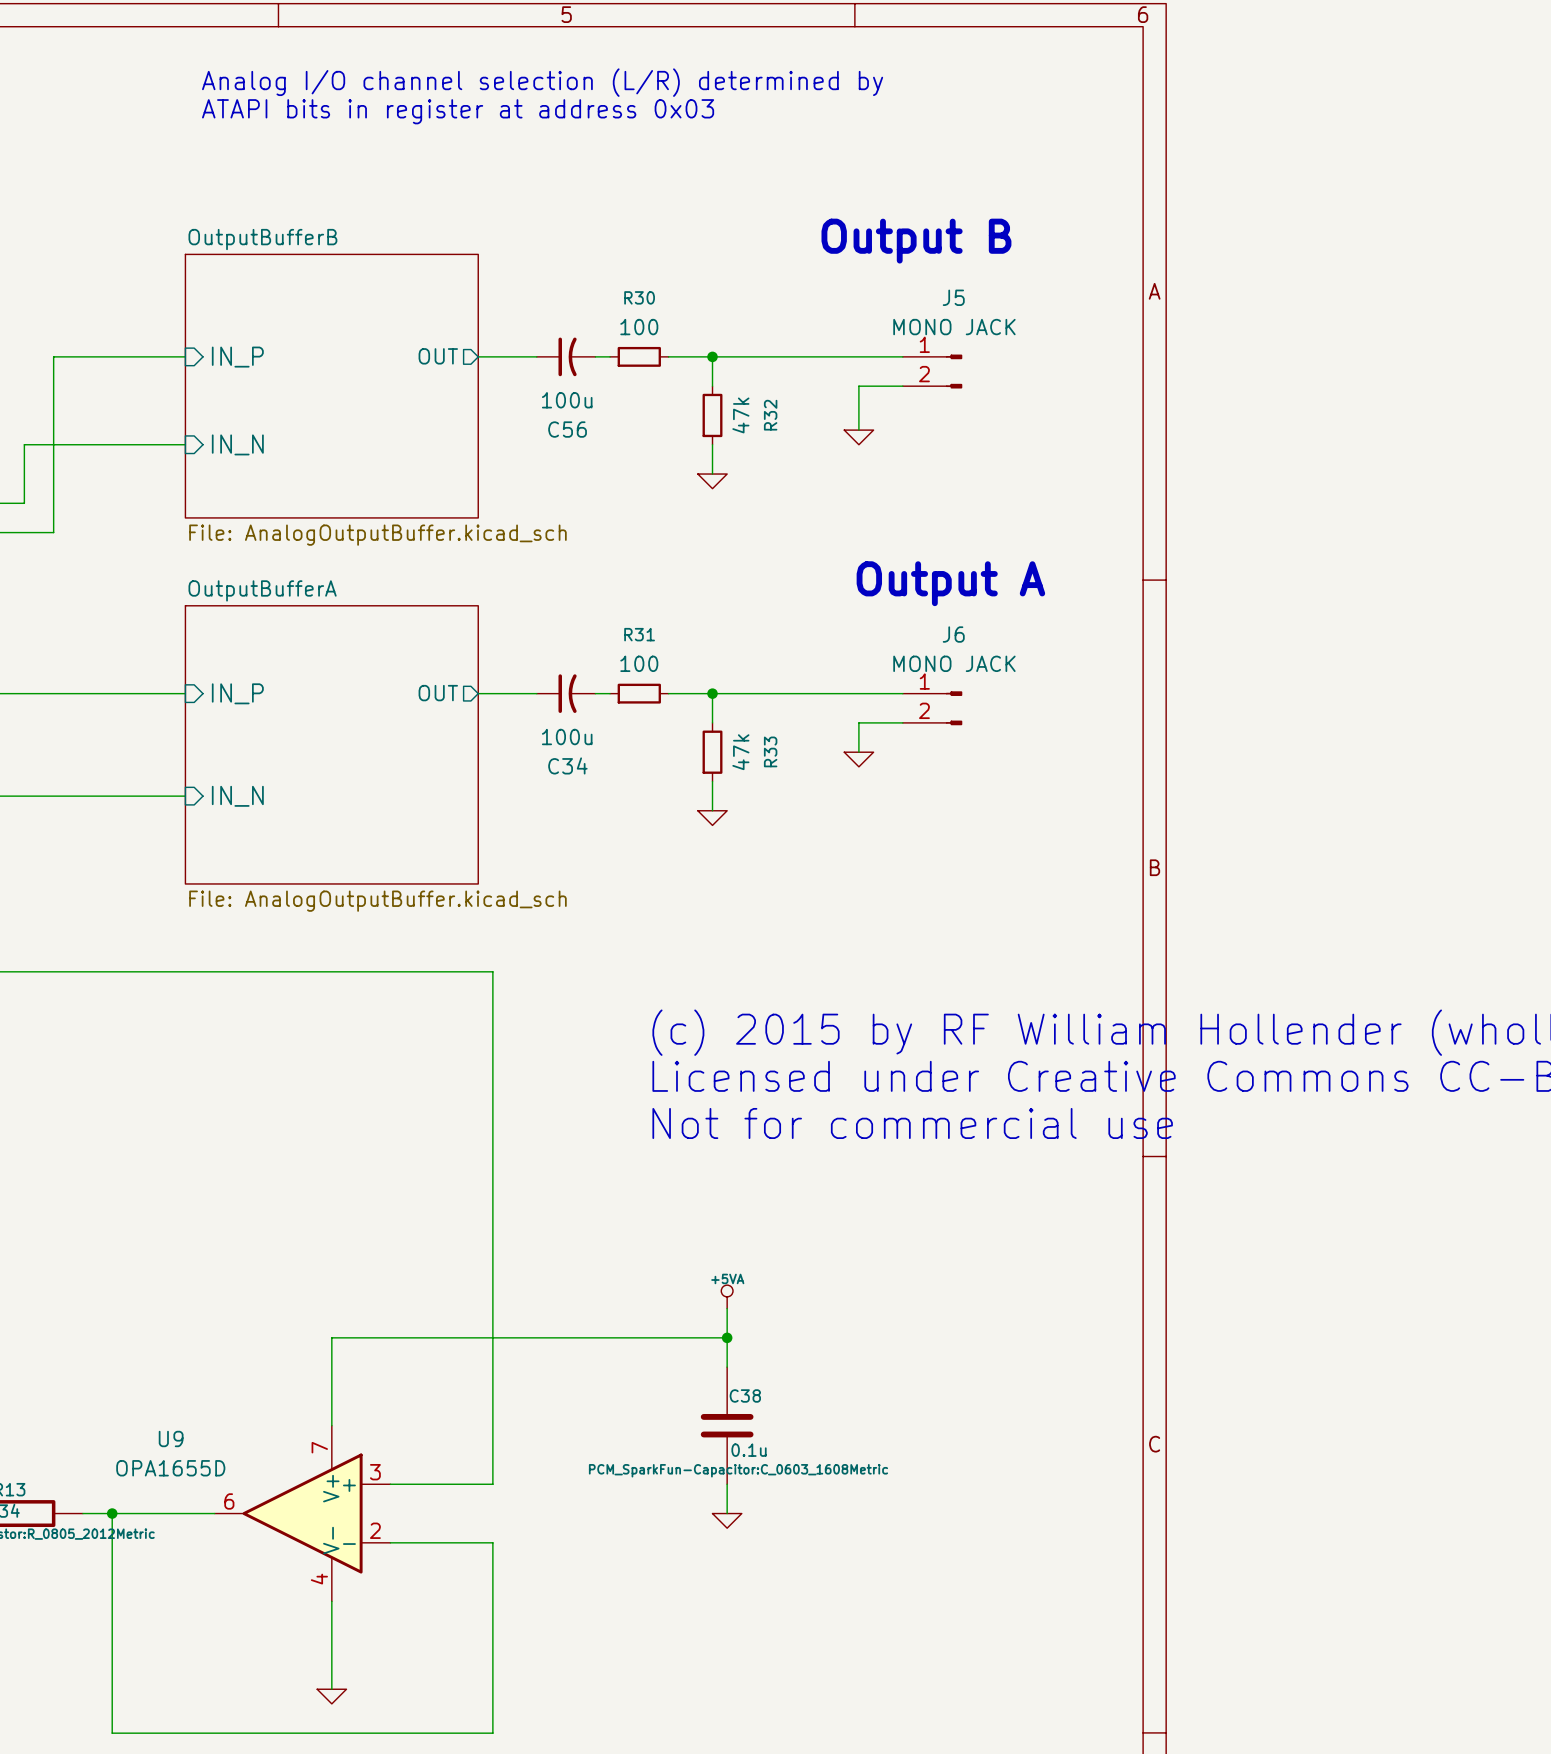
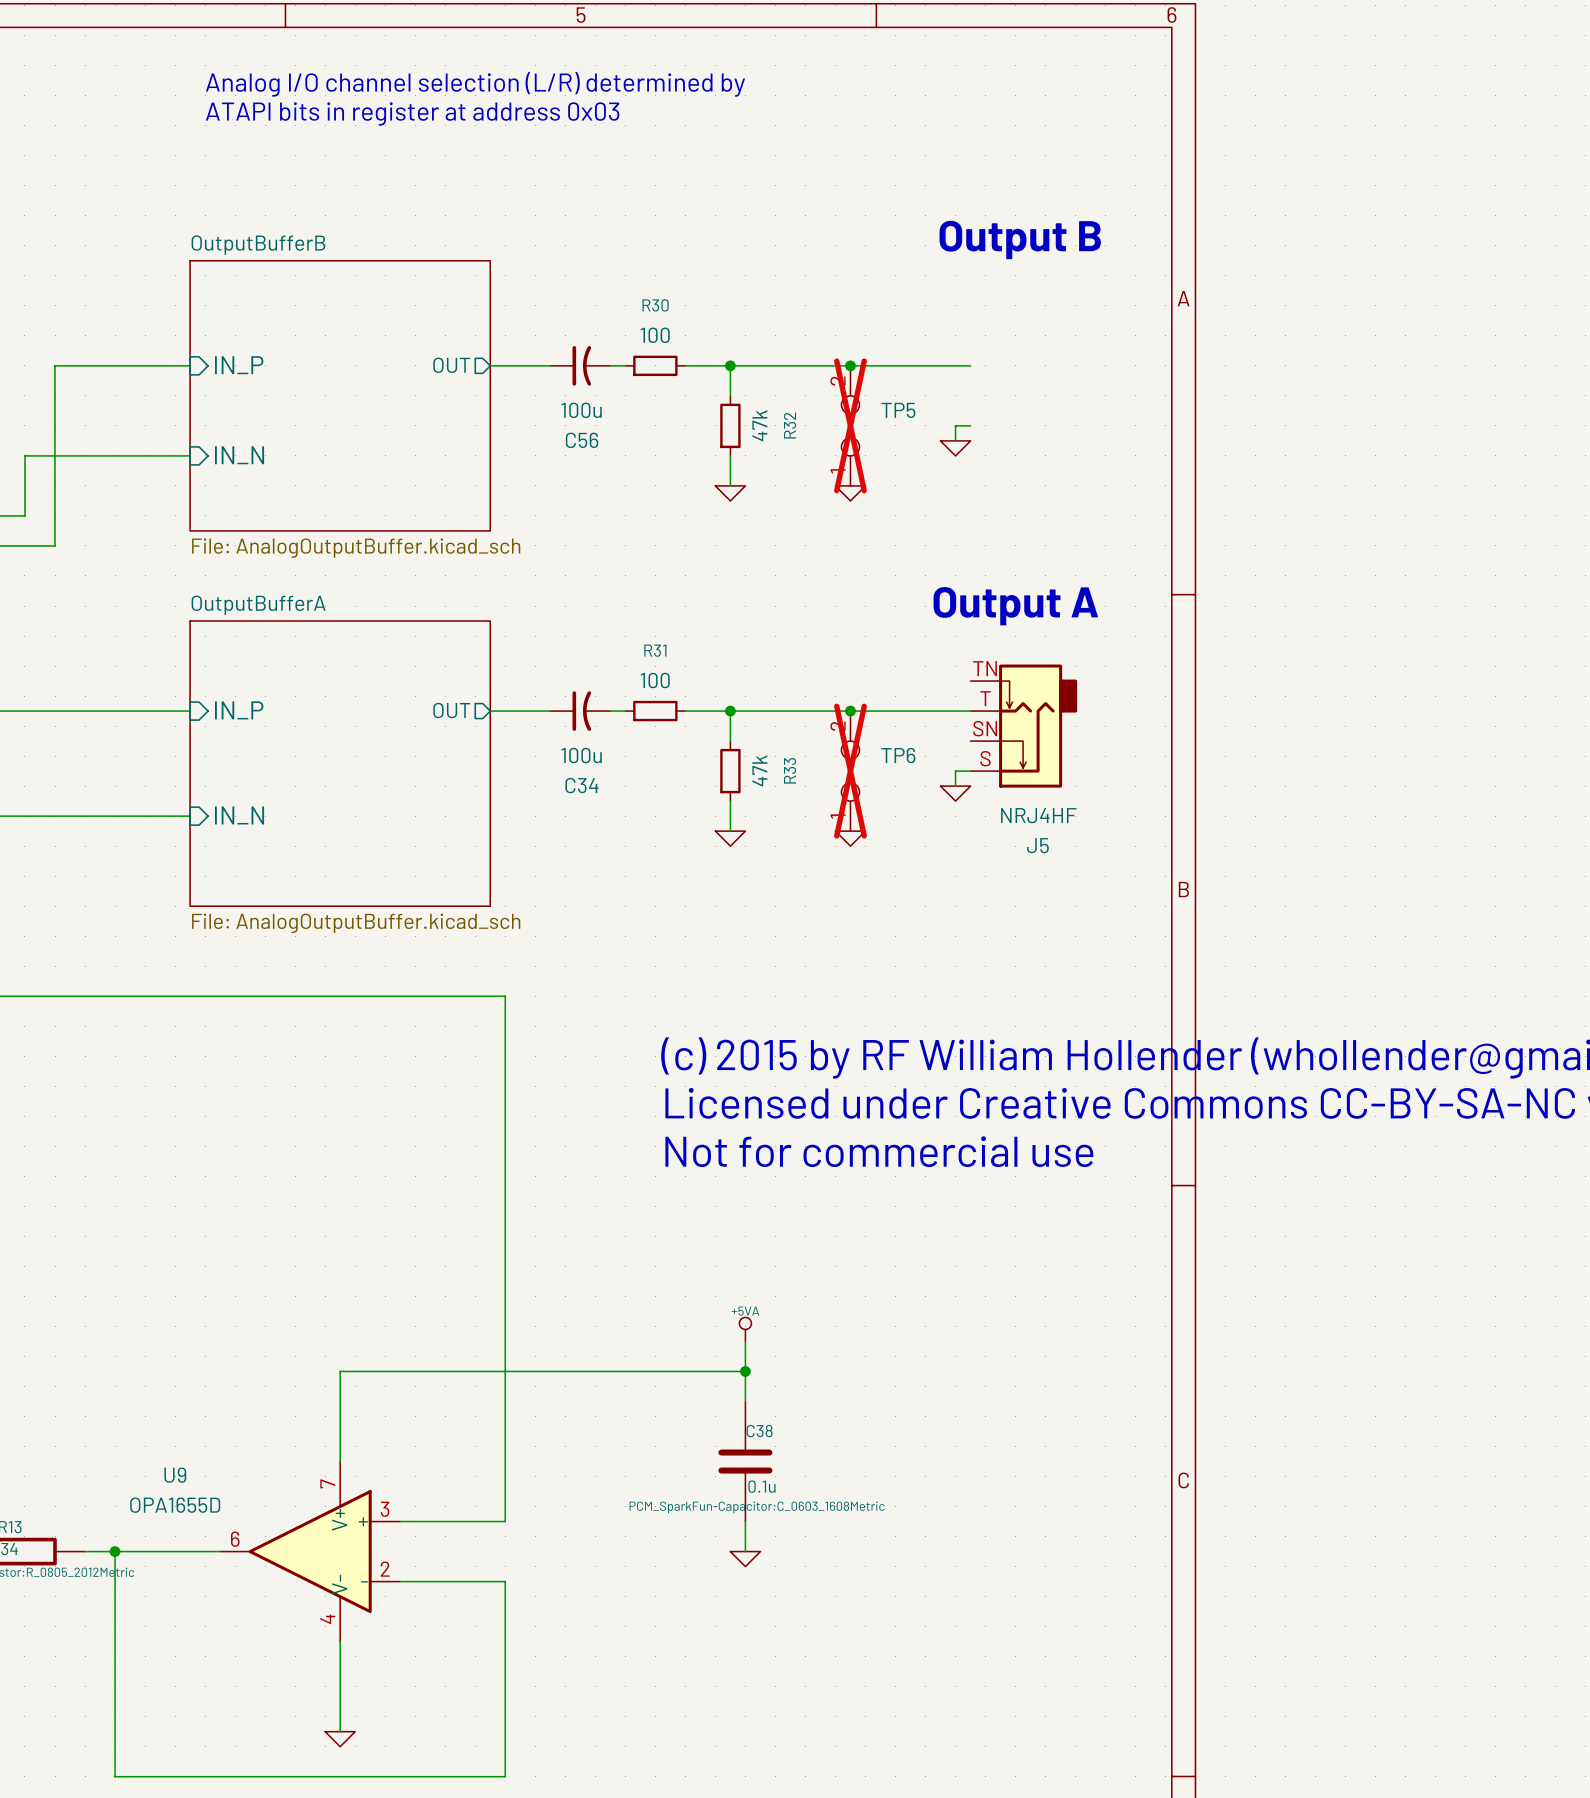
text position: Output B (916, 241) -> Output B (1020, 239)
J5 name position: J5 (953, 297) -> J5 (1037, 845)
J5 value: MONO JACK (954, 327) -> NRJ4HF (1038, 815)
J5 symbol: [902, 354, 963, 389] -> [970, 664, 1078, 788]
junction: none -> (850, 365)
wire: (902, 386) (858, 386) (858, 430) -> none
TP5: none -> (850, 425)
wire: none -> (970, 425) (955, 425) (955, 440)
power symbol: (858, 437) -> none
power symbol: none -> (955, 448)
power symbol: none -> (850, 493)
text position: Output A (950, 583) -> Output A (1015, 606)
junction: none -> (850, 711)
J6: MONO JACK (932, 708) -> none
wire: (902, 722) (858, 722) (858, 752) -> none
TP6: none -> (850, 771)
wire: none -> (970, 771) (955, 771) (955, 786)
power symbol: (858, 759) -> none
power symbol: none -> (955, 793)
power symbol: none -> (850, 838)

